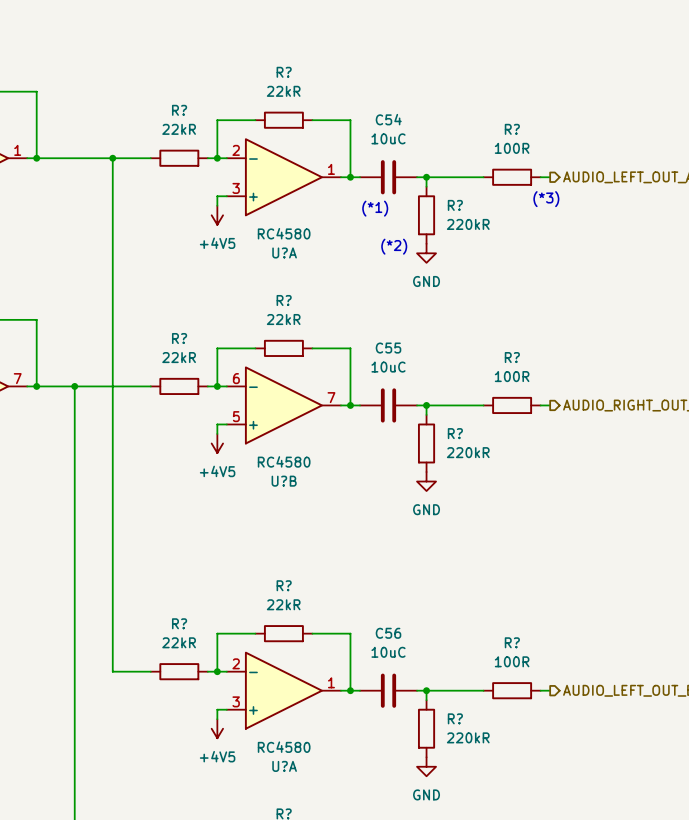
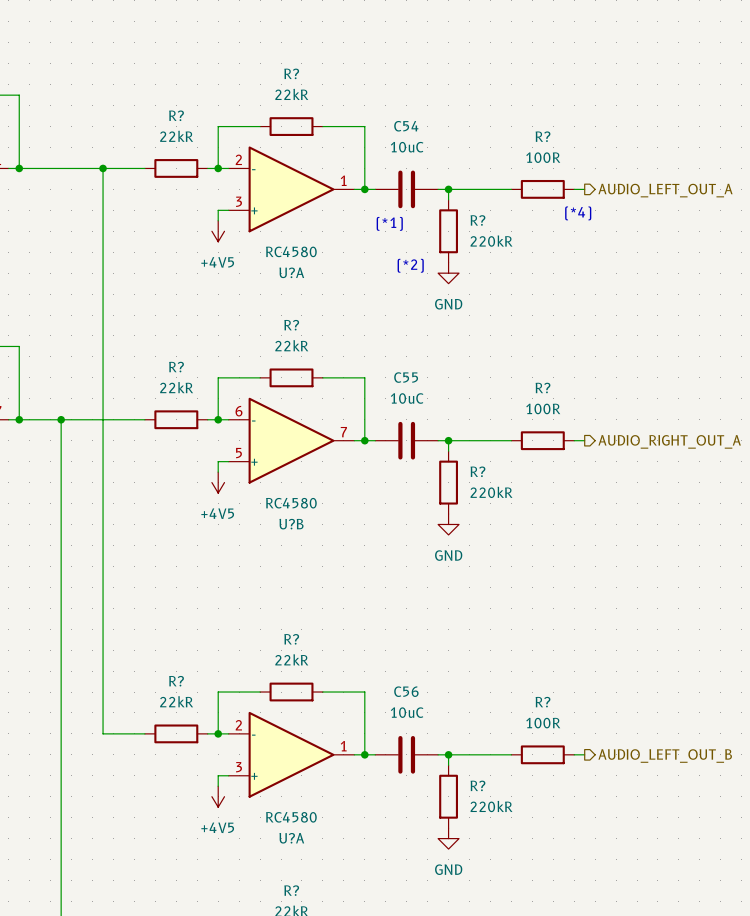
text: (*3) (546, 199) -> (*4) (578, 213)

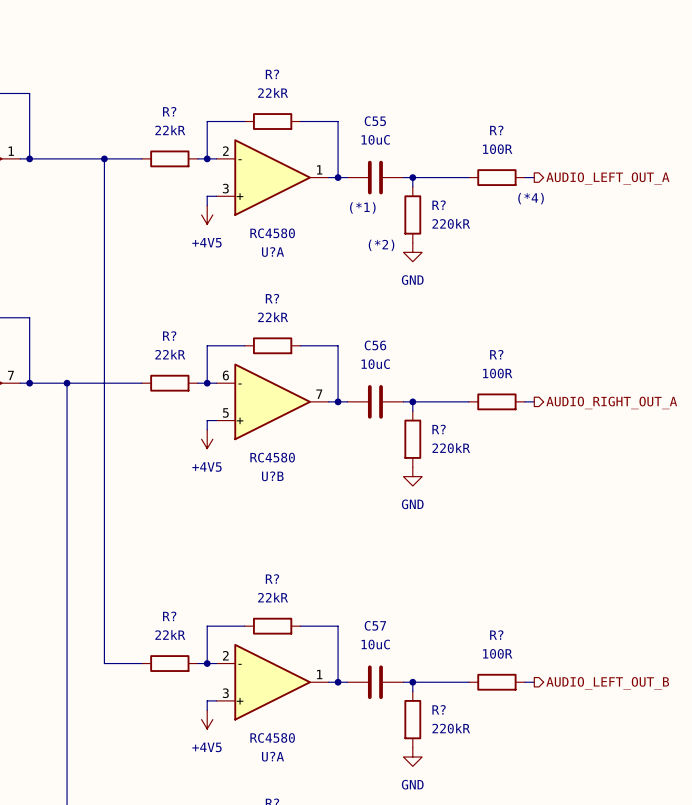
C54 name: C54 (406, 126) -> C55 (375, 121)
C55 name: C55 (406, 377) -> C56 (375, 345)
C56 name: C56 (406, 691) -> C57 (375, 625)

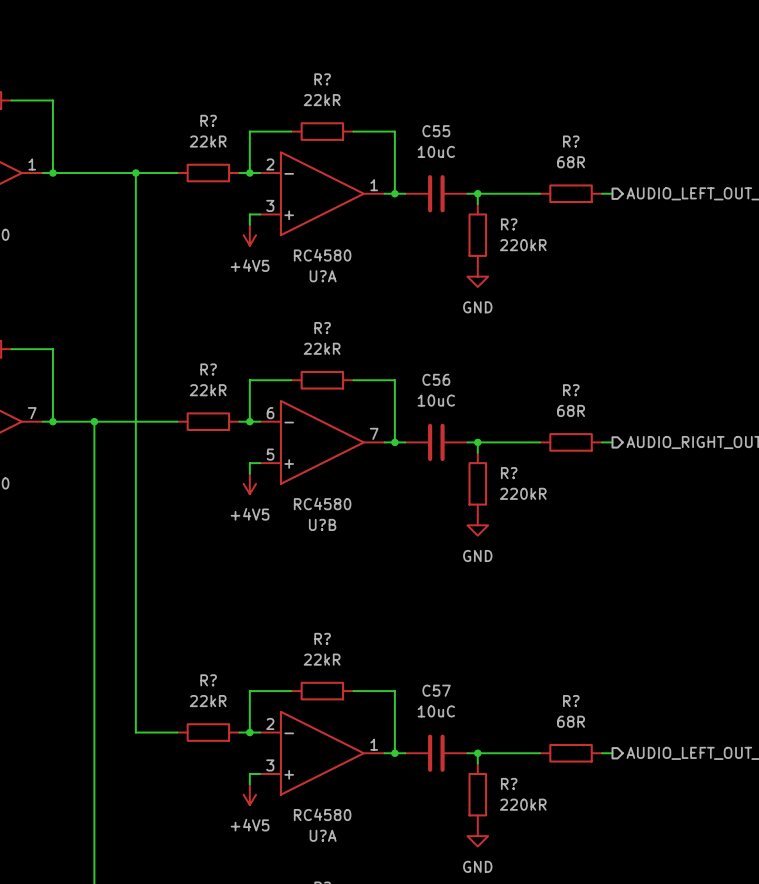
R? value: 100R (497, 149) -> 68R (571, 162)
text: (*4) (531, 198) -> none
text: (*1) (362, 207) -> none
text: (*2) (381, 245) -> none
R? value: 100R (497, 373) -> 68R (571, 410)
R? value: 100R (497, 653) -> 68R (571, 721)

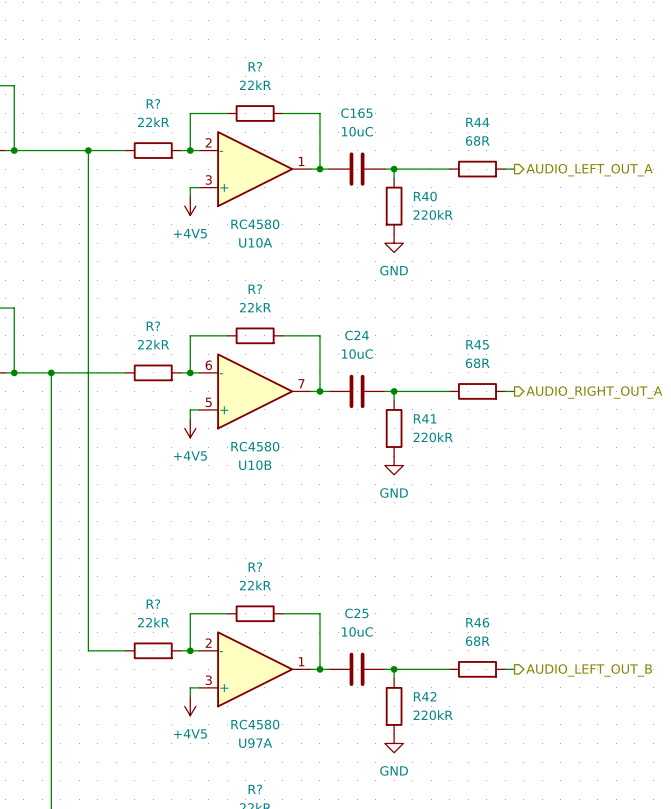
C55 name: C55 (436, 131) -> C165 (356, 113)
R? name: R? (571, 141) -> R44 (477, 122)
R? name: R? (509, 224) -> R40 (425, 196)
U?A name: U?A (323, 276) -> U10A (255, 242)
C56 name: C56 (436, 379) -> C24 (357, 335)
R? name: R? (571, 390) -> R45 (477, 344)
R? name: R? (509, 473) -> R41 (425, 418)
U?B name: U?B (322, 524) -> U10B (255, 465)
C57 name: C57 (436, 690) -> C25 (356, 613)
R? name: R? (571, 701) -> R46 (477, 622)
R? name: R? (509, 783) -> R42 (425, 696)
U?A name: U?A (323, 835) -> U97A (255, 743)

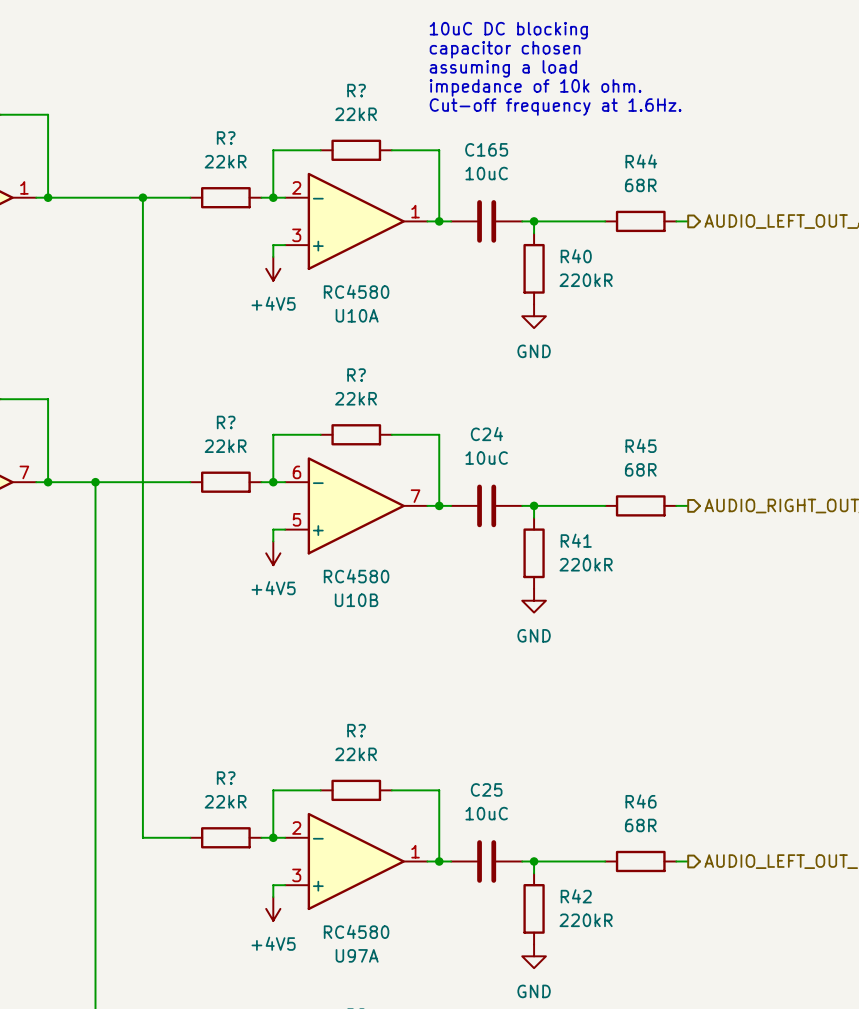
text: none -> 10uC DC blocking (508, 30)
text: none -> capacitor chosen (505, 49)
text: none -> assuming a load (503, 68)
text: none -> impedance of 10k ohm. (535, 87)
text: none -> Cut-off frequency at 1.6Hz. (555, 107)

